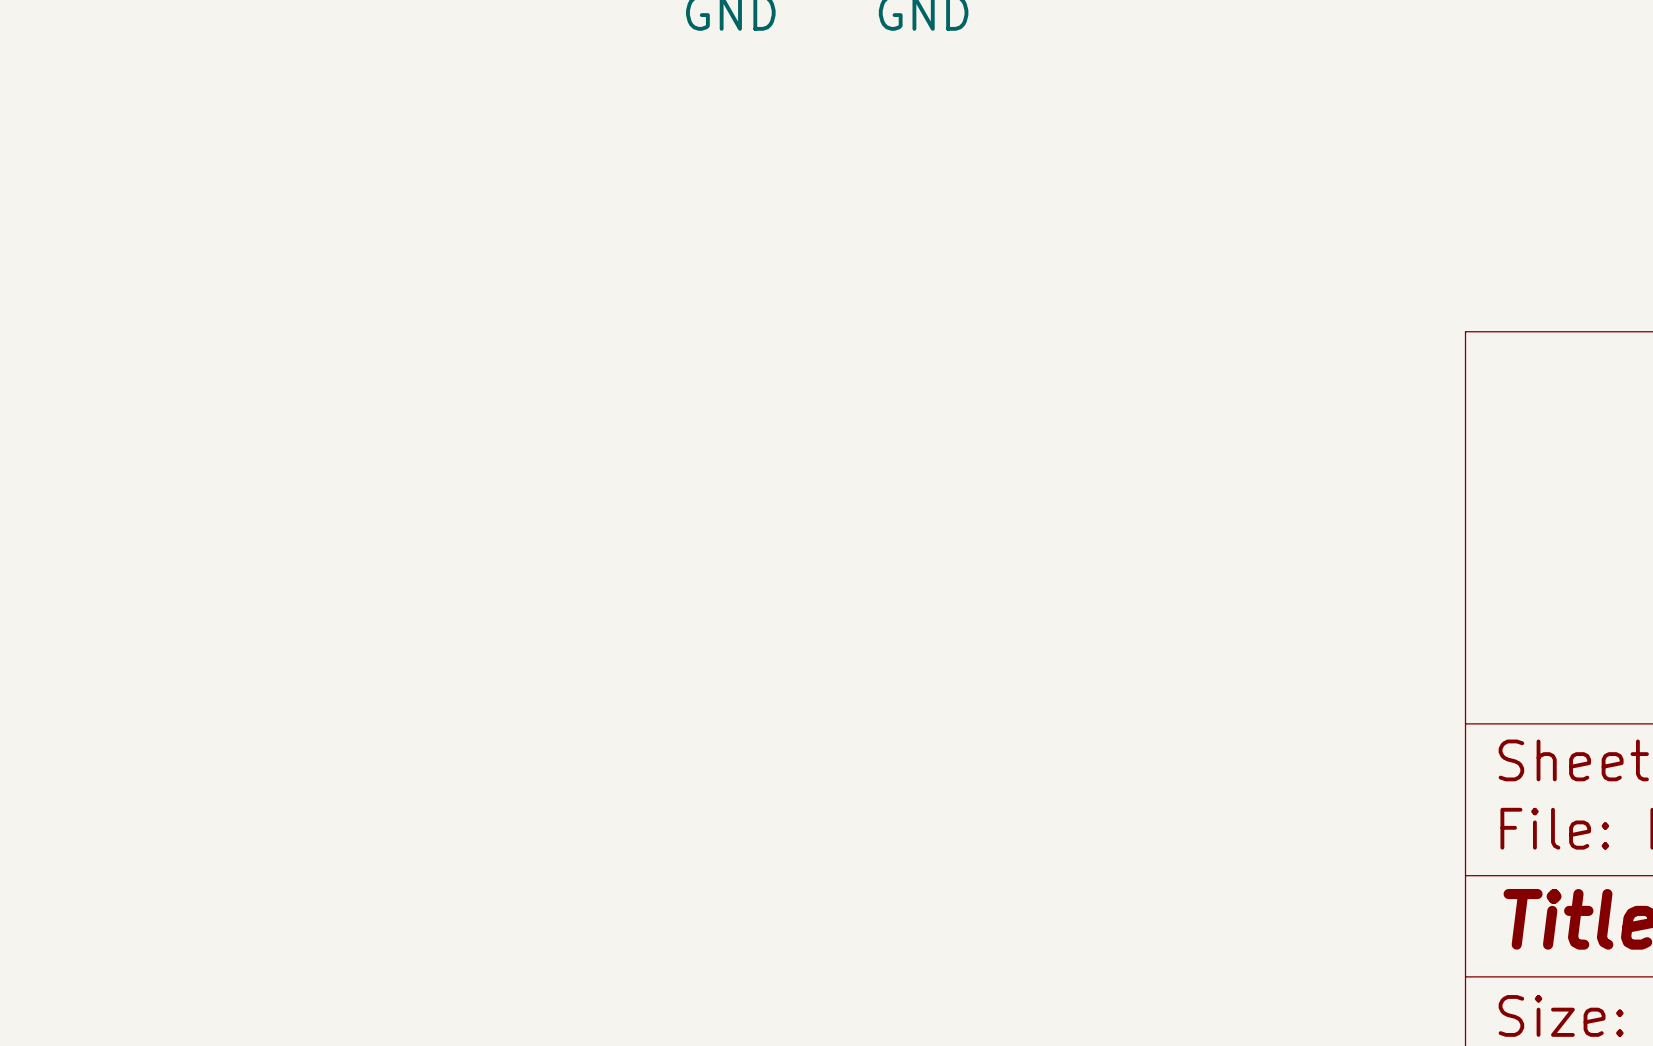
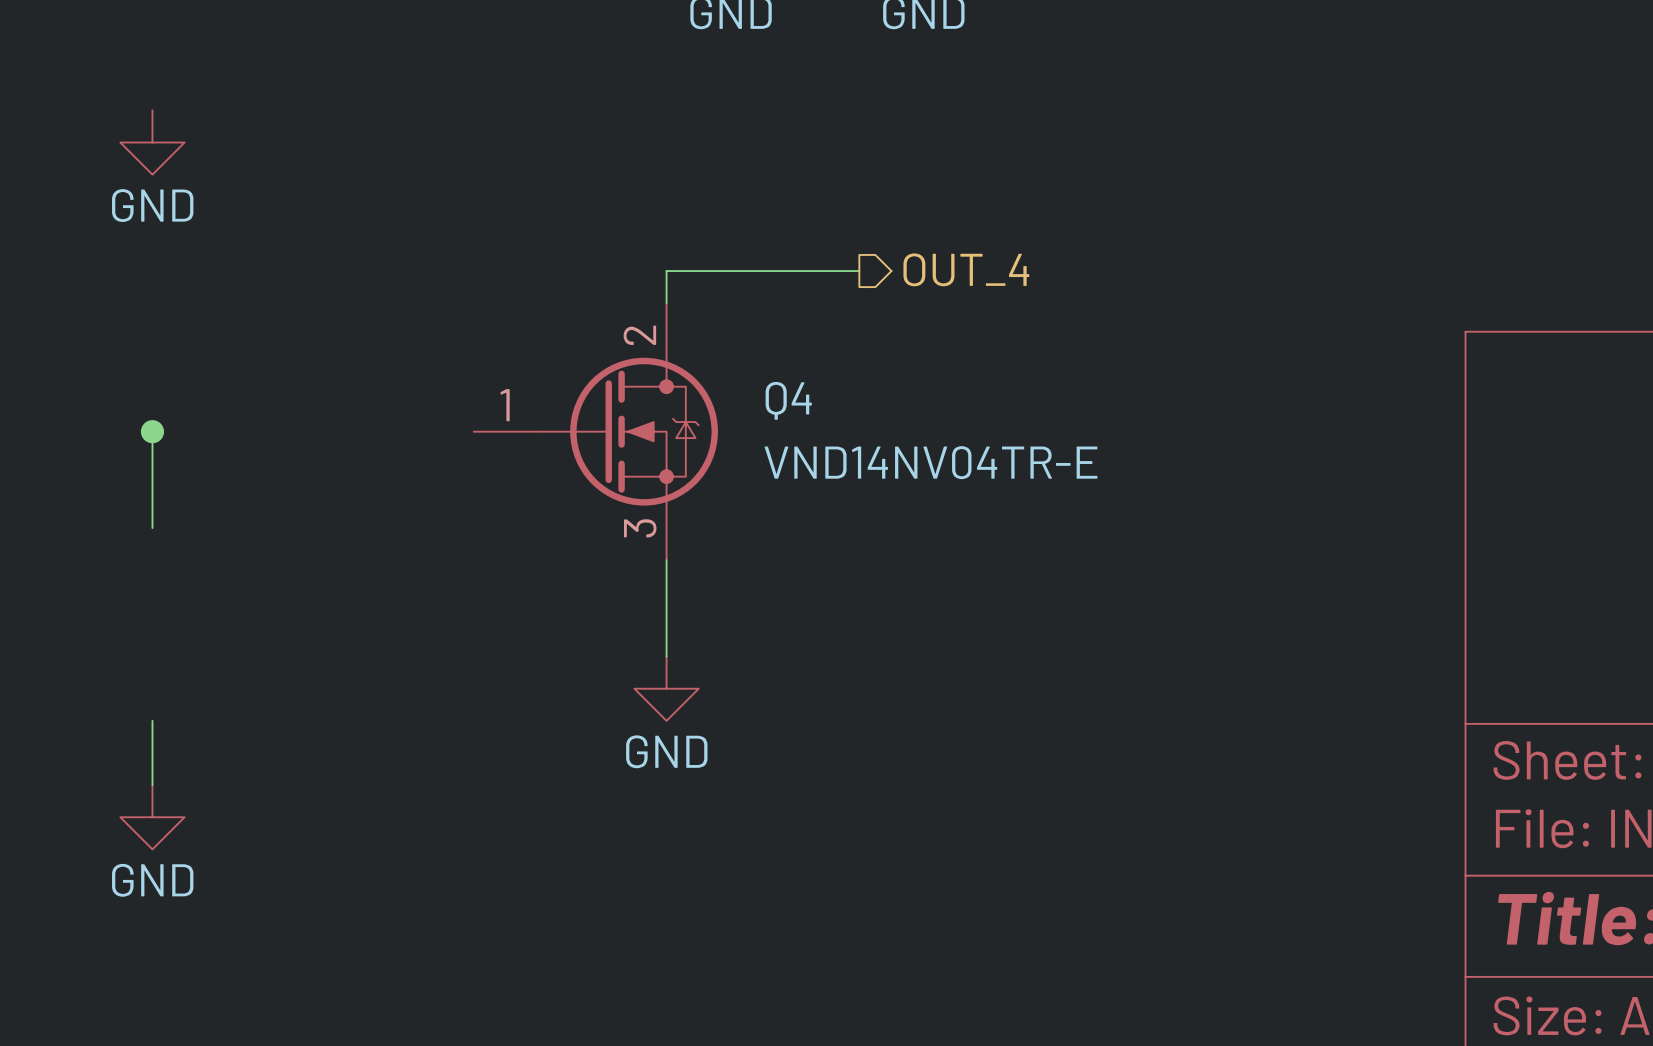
power symbol: none -> GND (152, 142)
hierarchical label: none -> OUT_4 (966, 269)
wire: none -> (859, 271) (666, 271) (666, 303)
wire: none -> (152, 431) (152, 528)
junction: none -> (152, 431)
Q4: none -> VND14NV04TR-E (595, 431)
wire: none -> (666, 560) (666, 656)
power symbol: none -> GND (666, 688)
wire: none -> (152, 720) (152, 785)
power symbol: none -> GND (152, 817)

